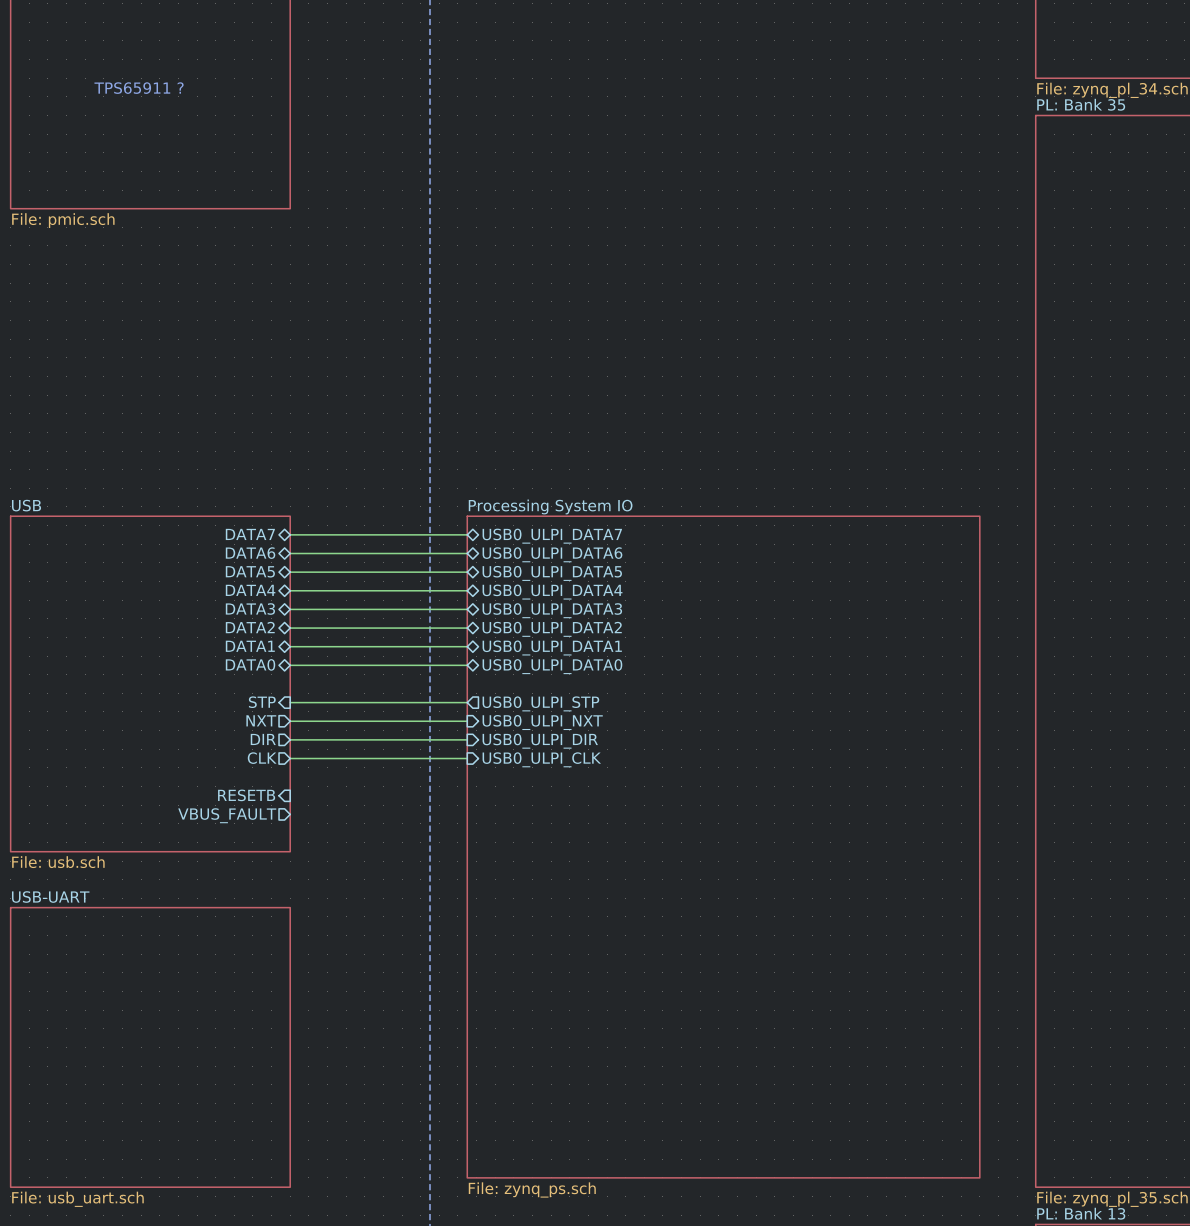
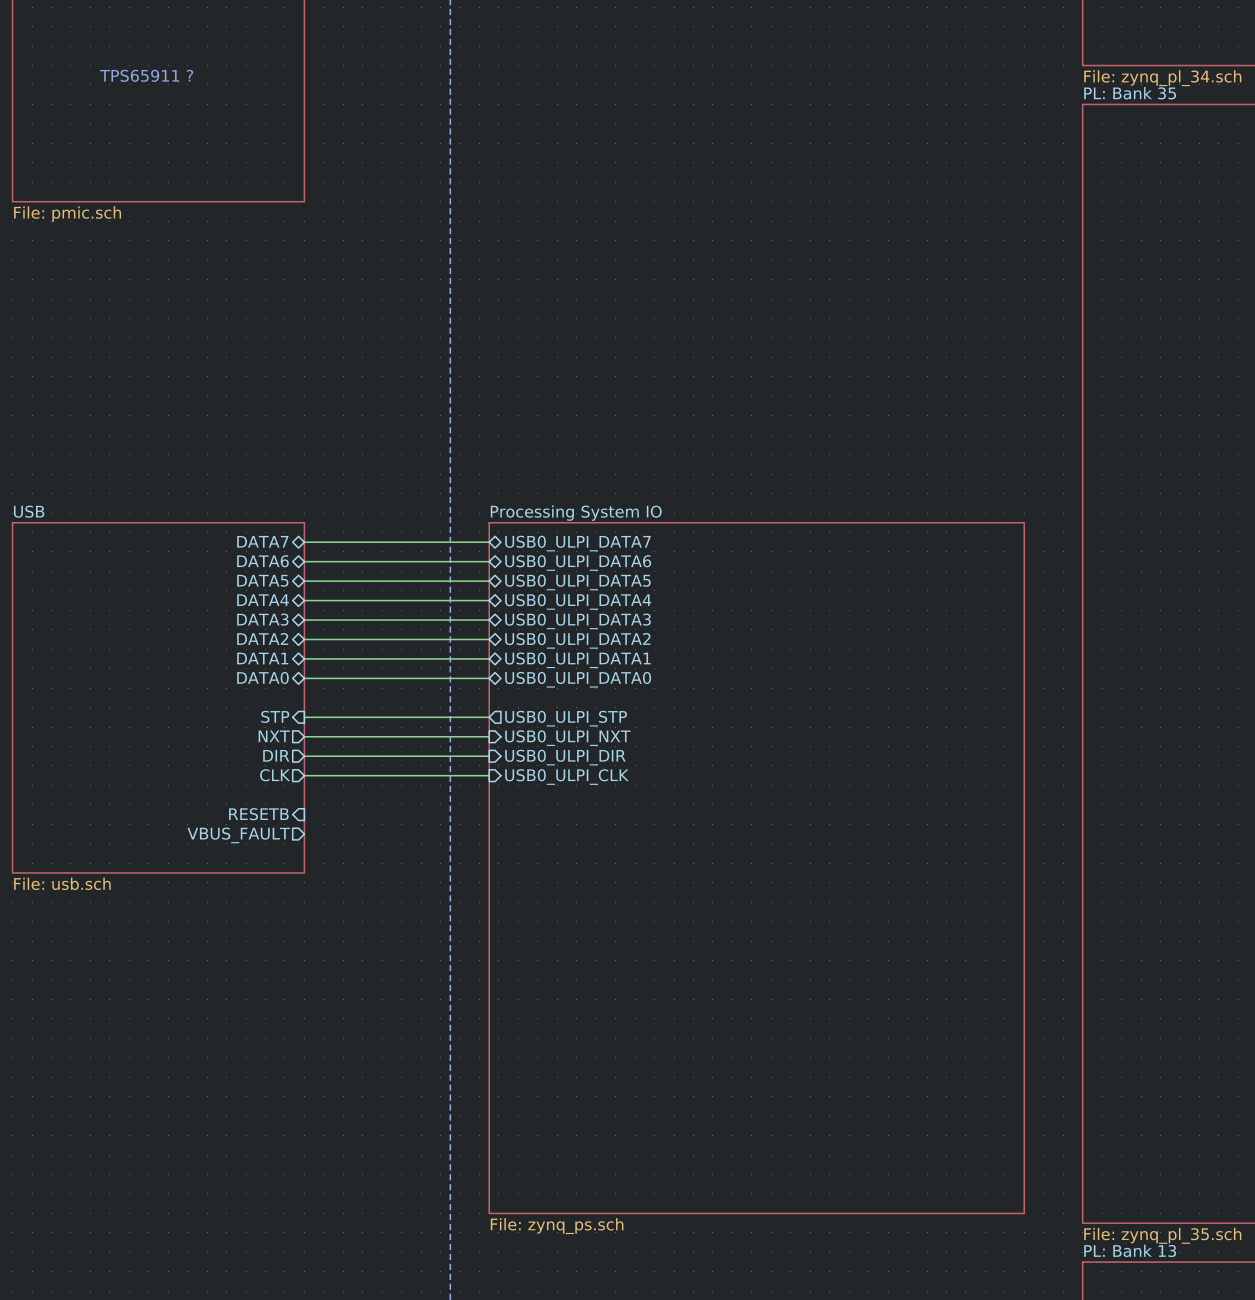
sheet USB-UART: File: usb_uart.sch (150, 1047) -> none

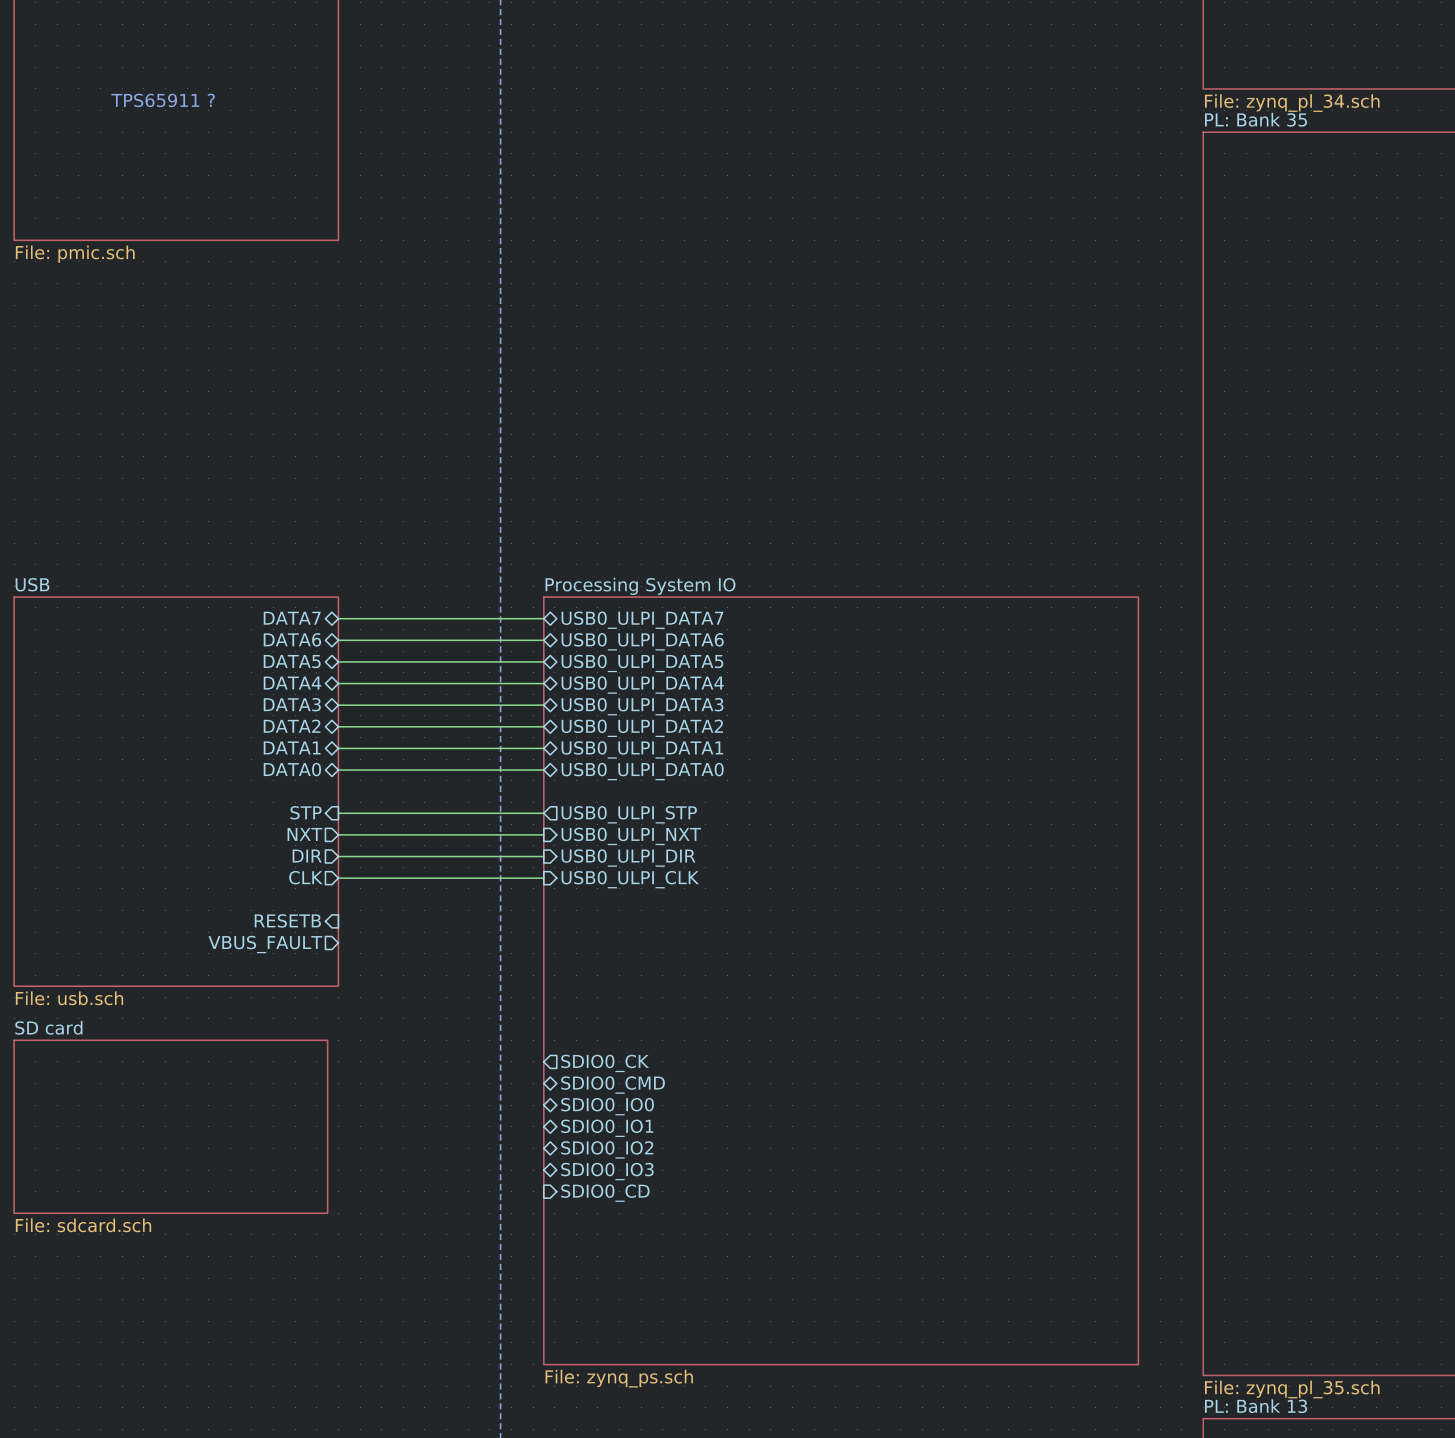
sheet pin: none -> SDIO0_CK (605, 1063)
sheet pin: none -> SDIO0_CMD (613, 1085)
sheet pin: none -> SDIO0_IO0 (607, 1106)
sheet SD card: none -> File: sdcard.sch (170, 1126)
sheet pin: none -> SDIO0_IO1 (607, 1128)
sheet pin: none -> SDIO0_IO2 (607, 1149)
sheet pin: none -> SDIO0_IO3 (607, 1171)
sheet pin: none -> SDIO0_CD (605, 1193)

